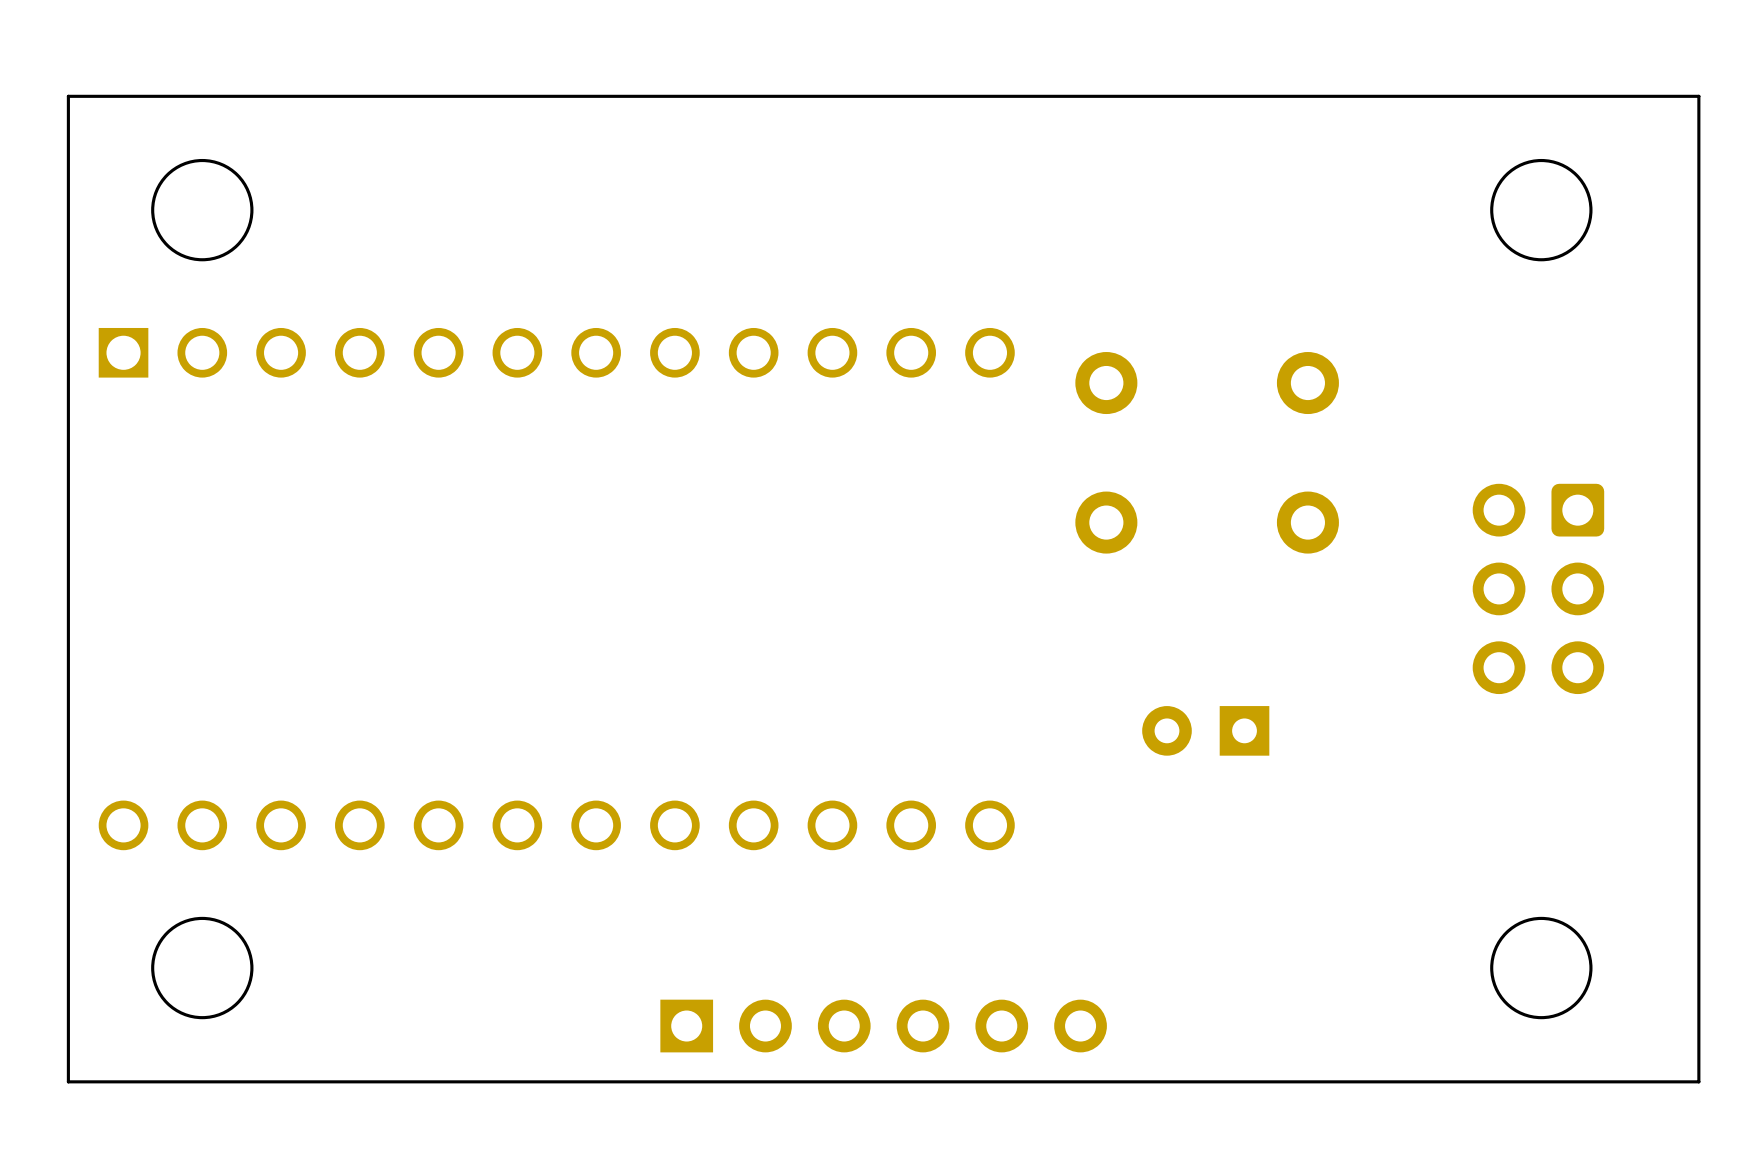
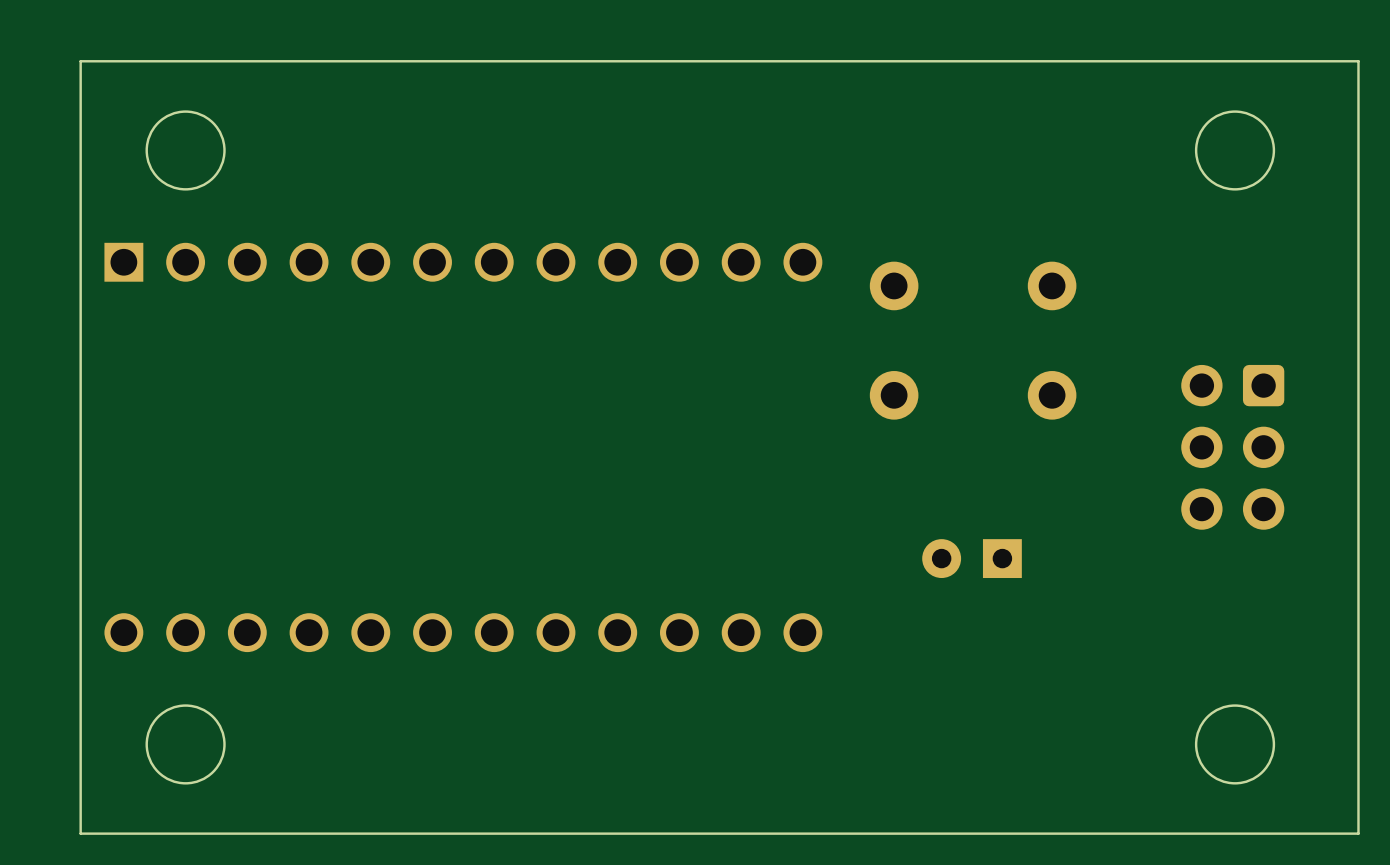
part: (883, 1026) -> none

